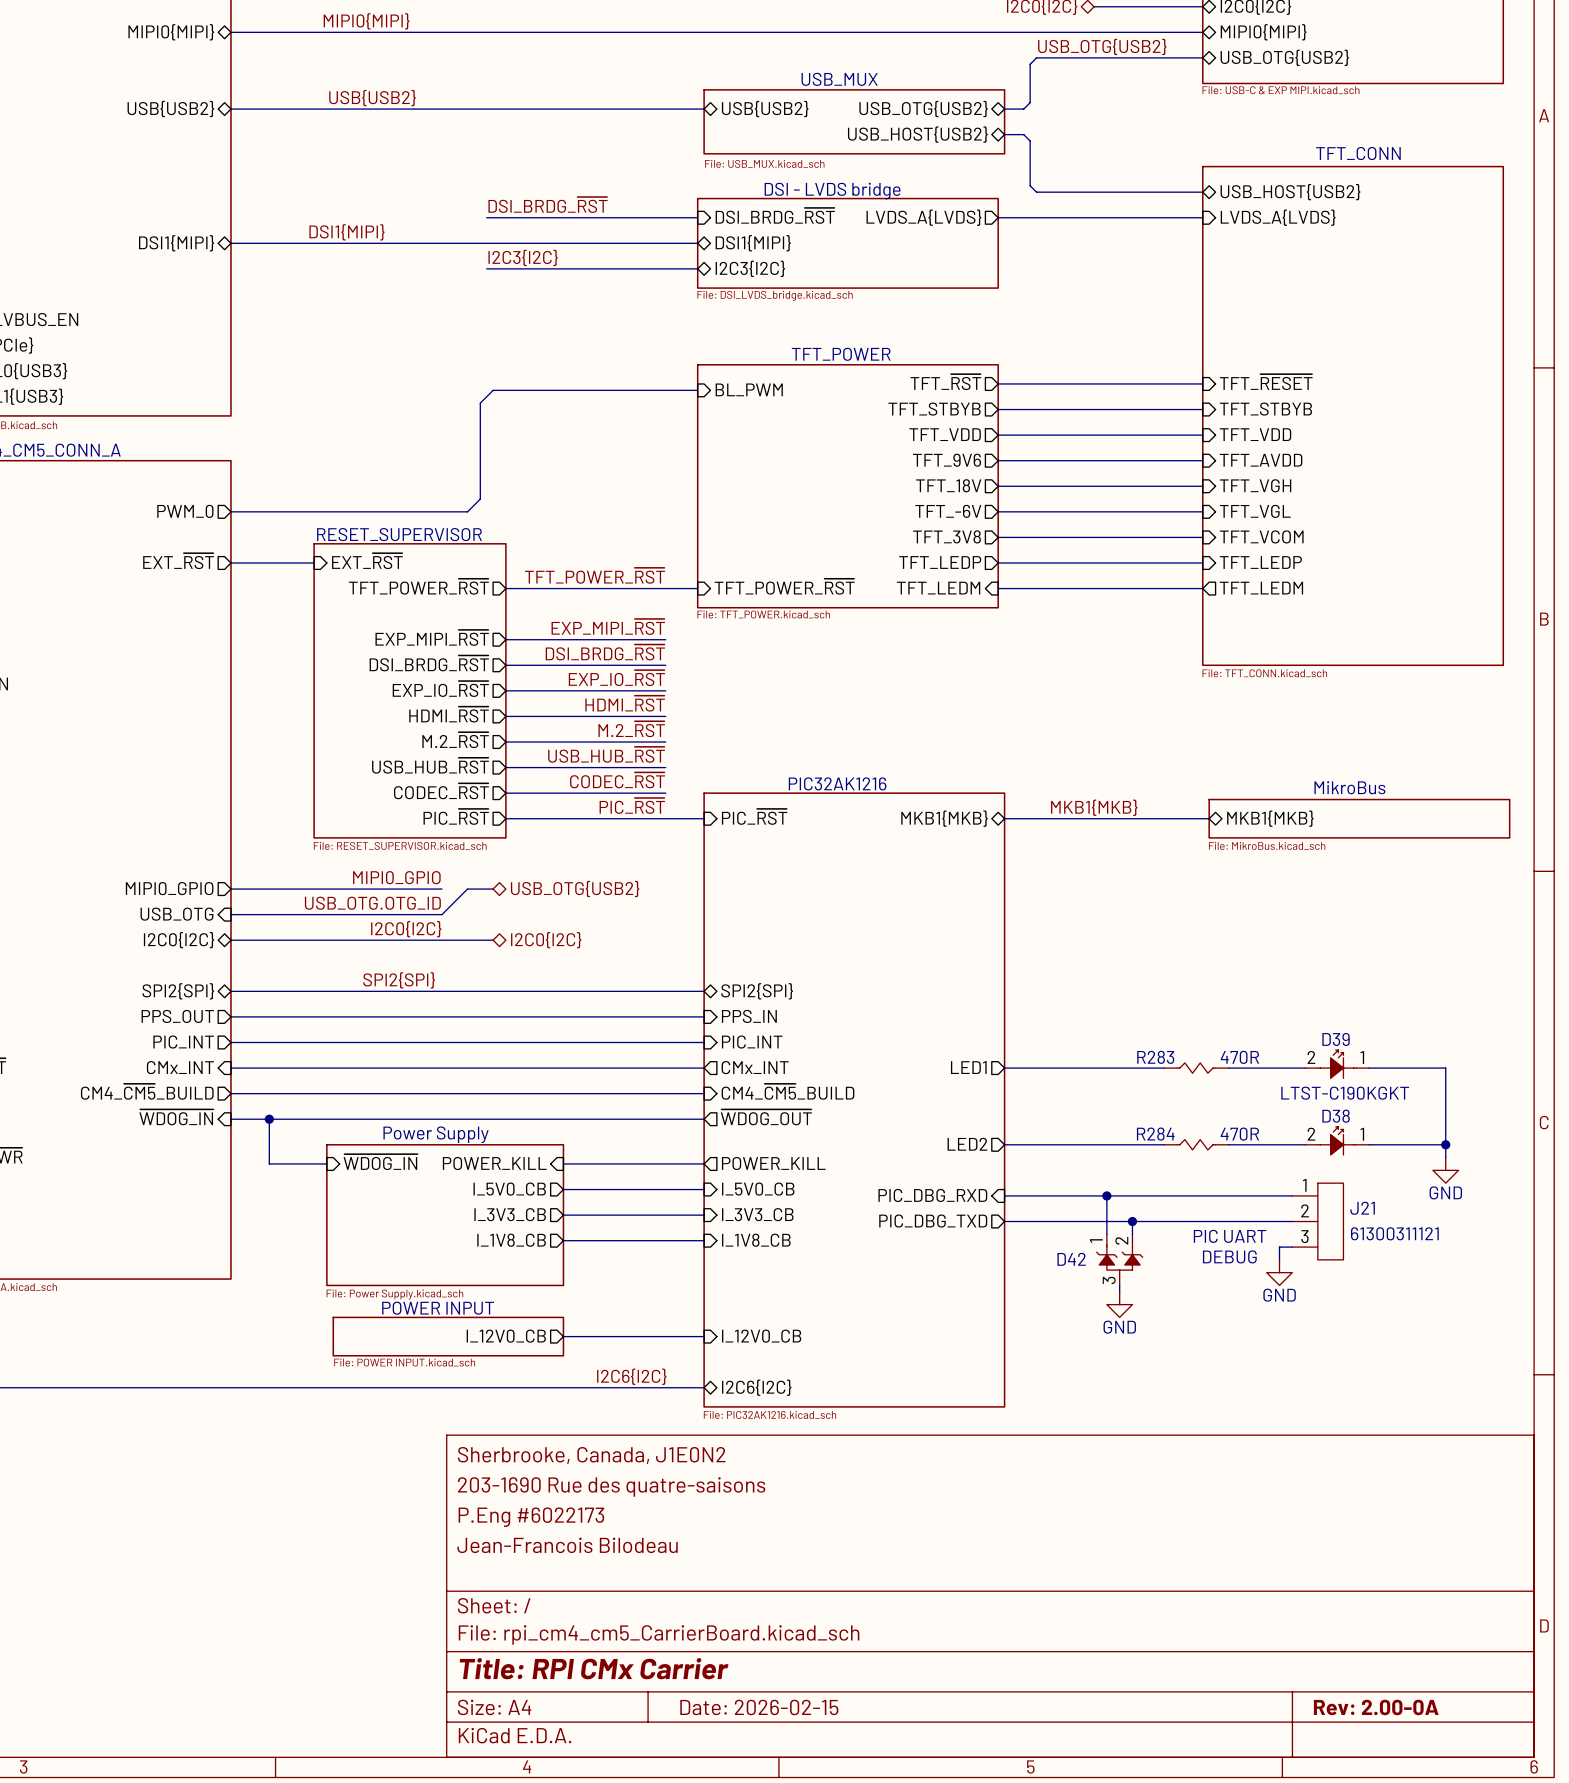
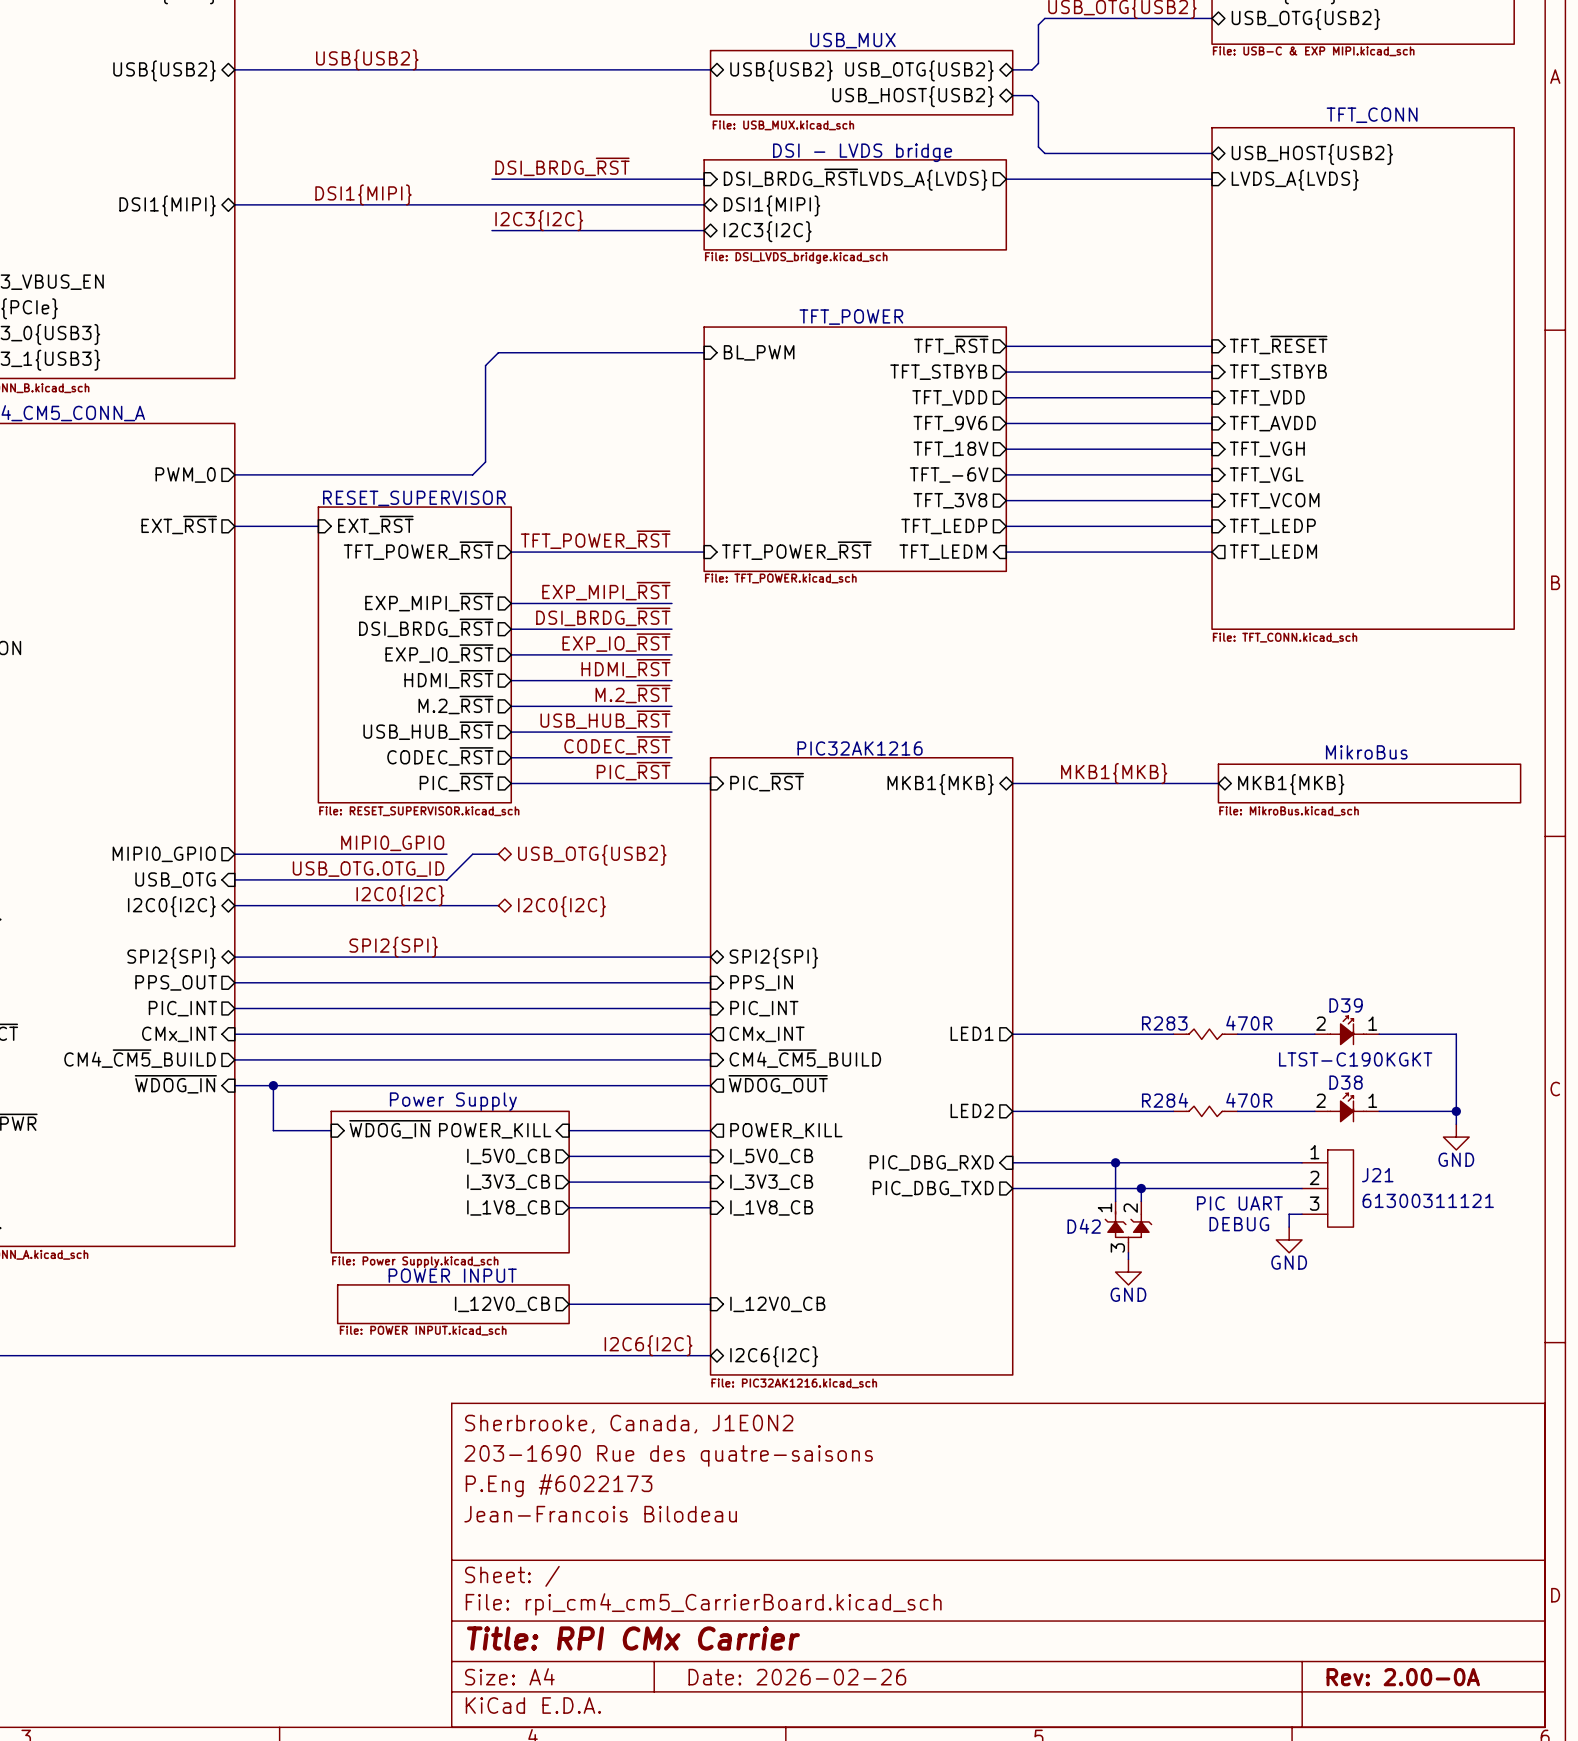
title block: Date: 2026-02-15 (759, 1707) -> Date: 2026-02-26 (797, 1677)

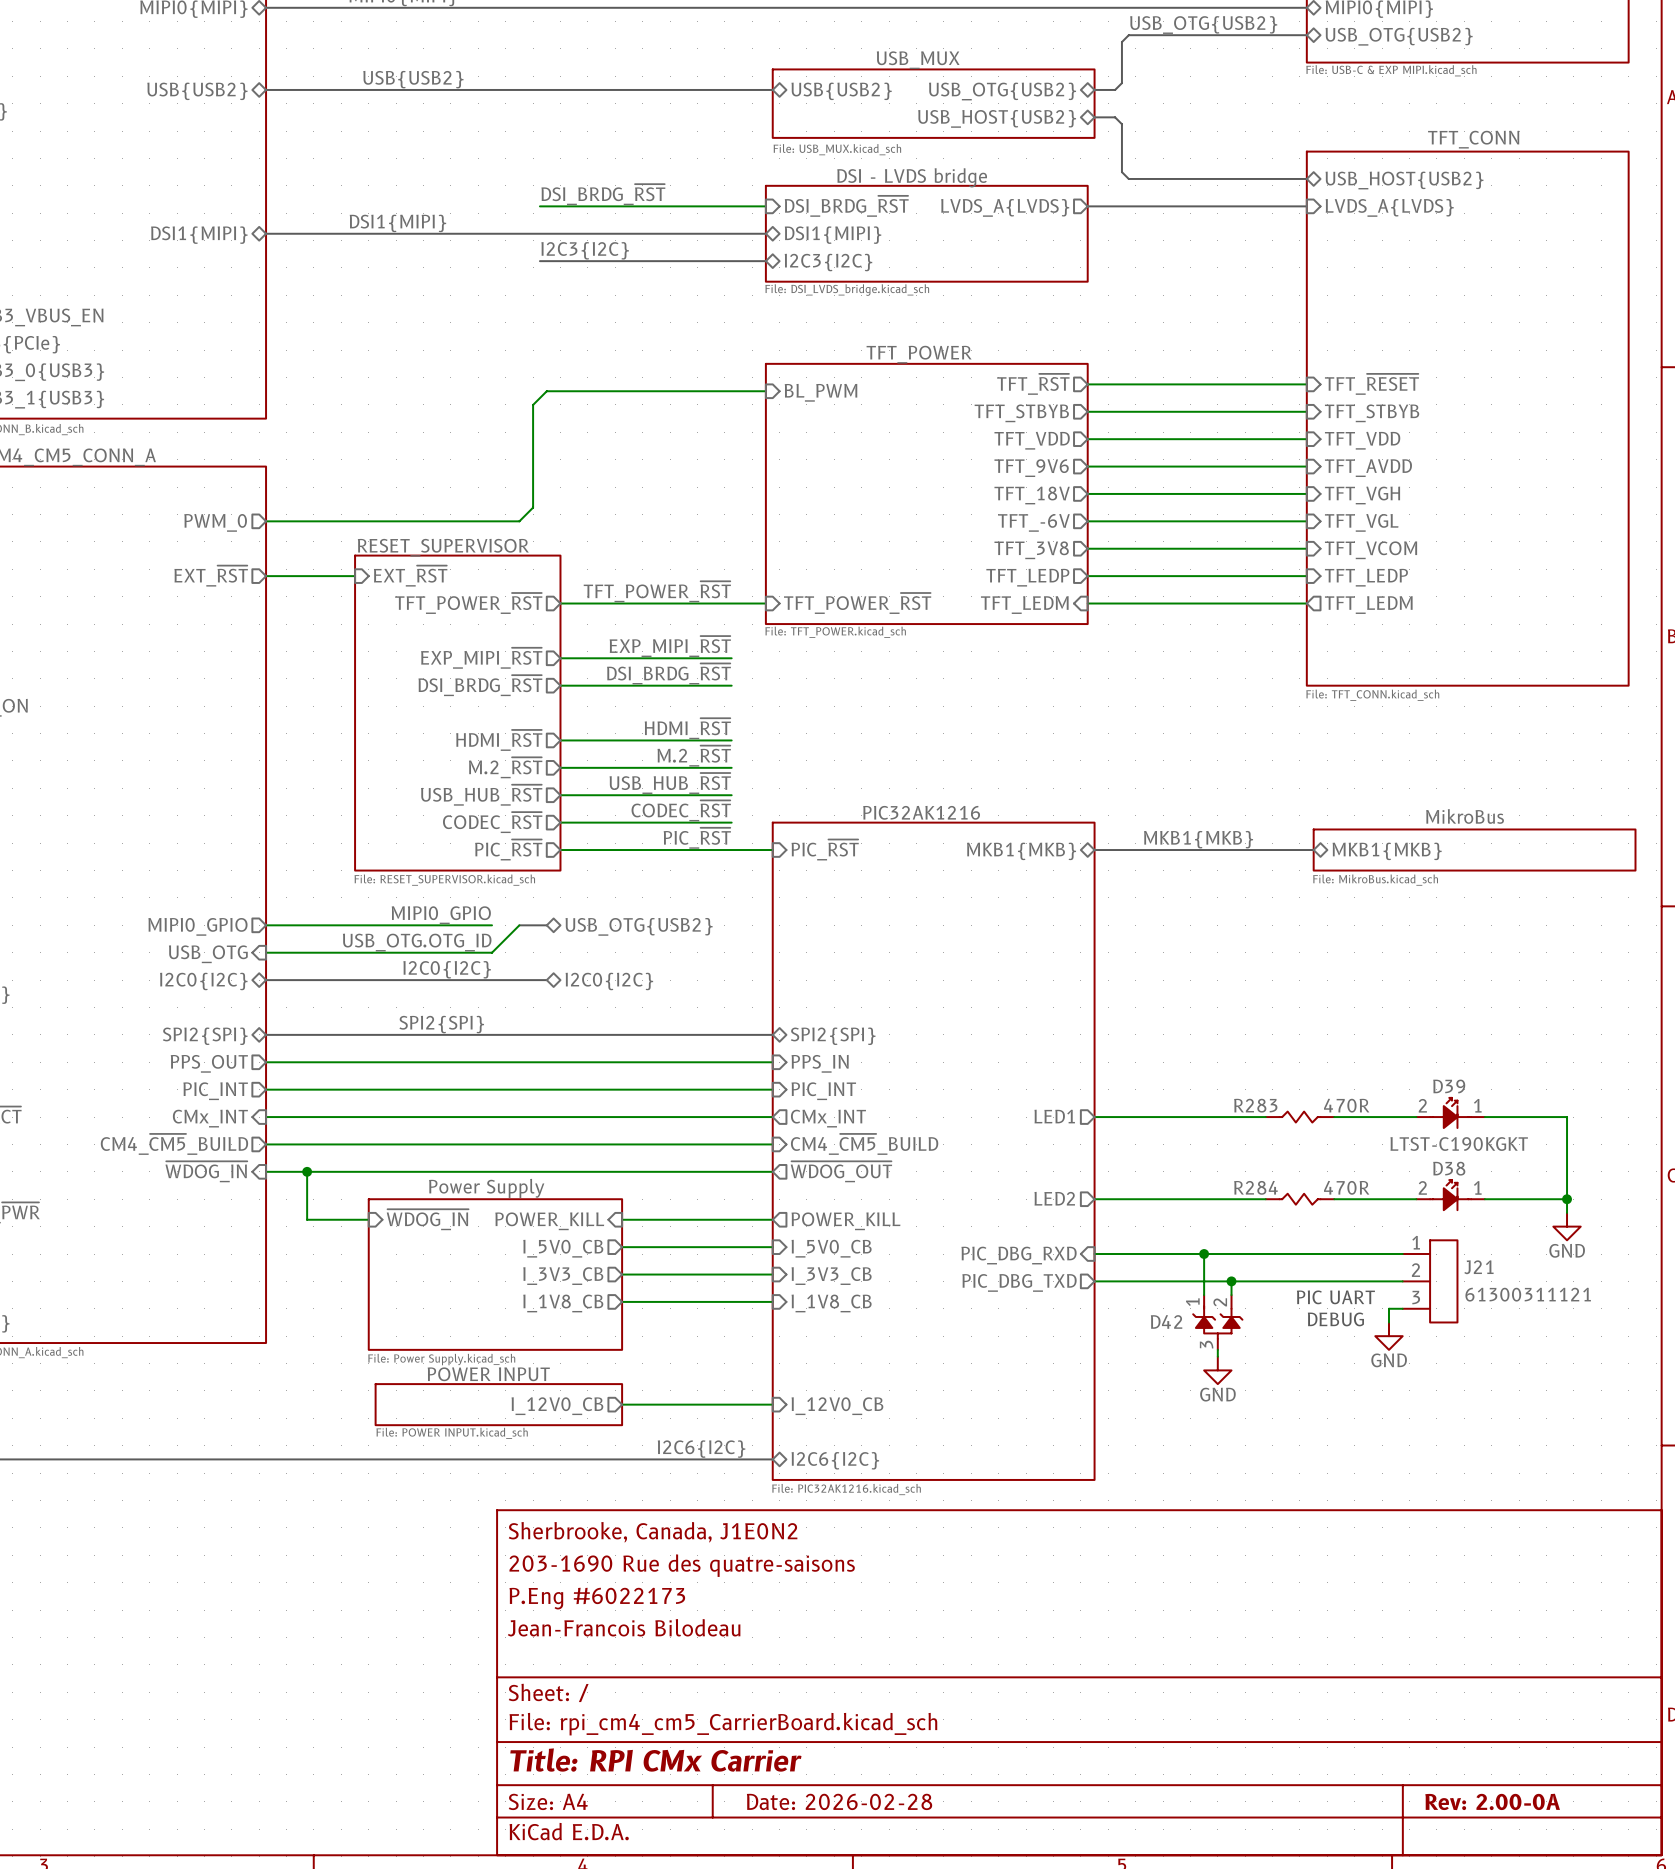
label: EXP_IO_~{RST} (616, 642) -> none
sheet pin: EXP_IO_~{RST} (439, 653) -> none
wire: (511, 654) (671, 654) -> none
title block: Date: 2026-02-26 (797, 1677) -> Date: 2026-02-28 (839, 1801)

